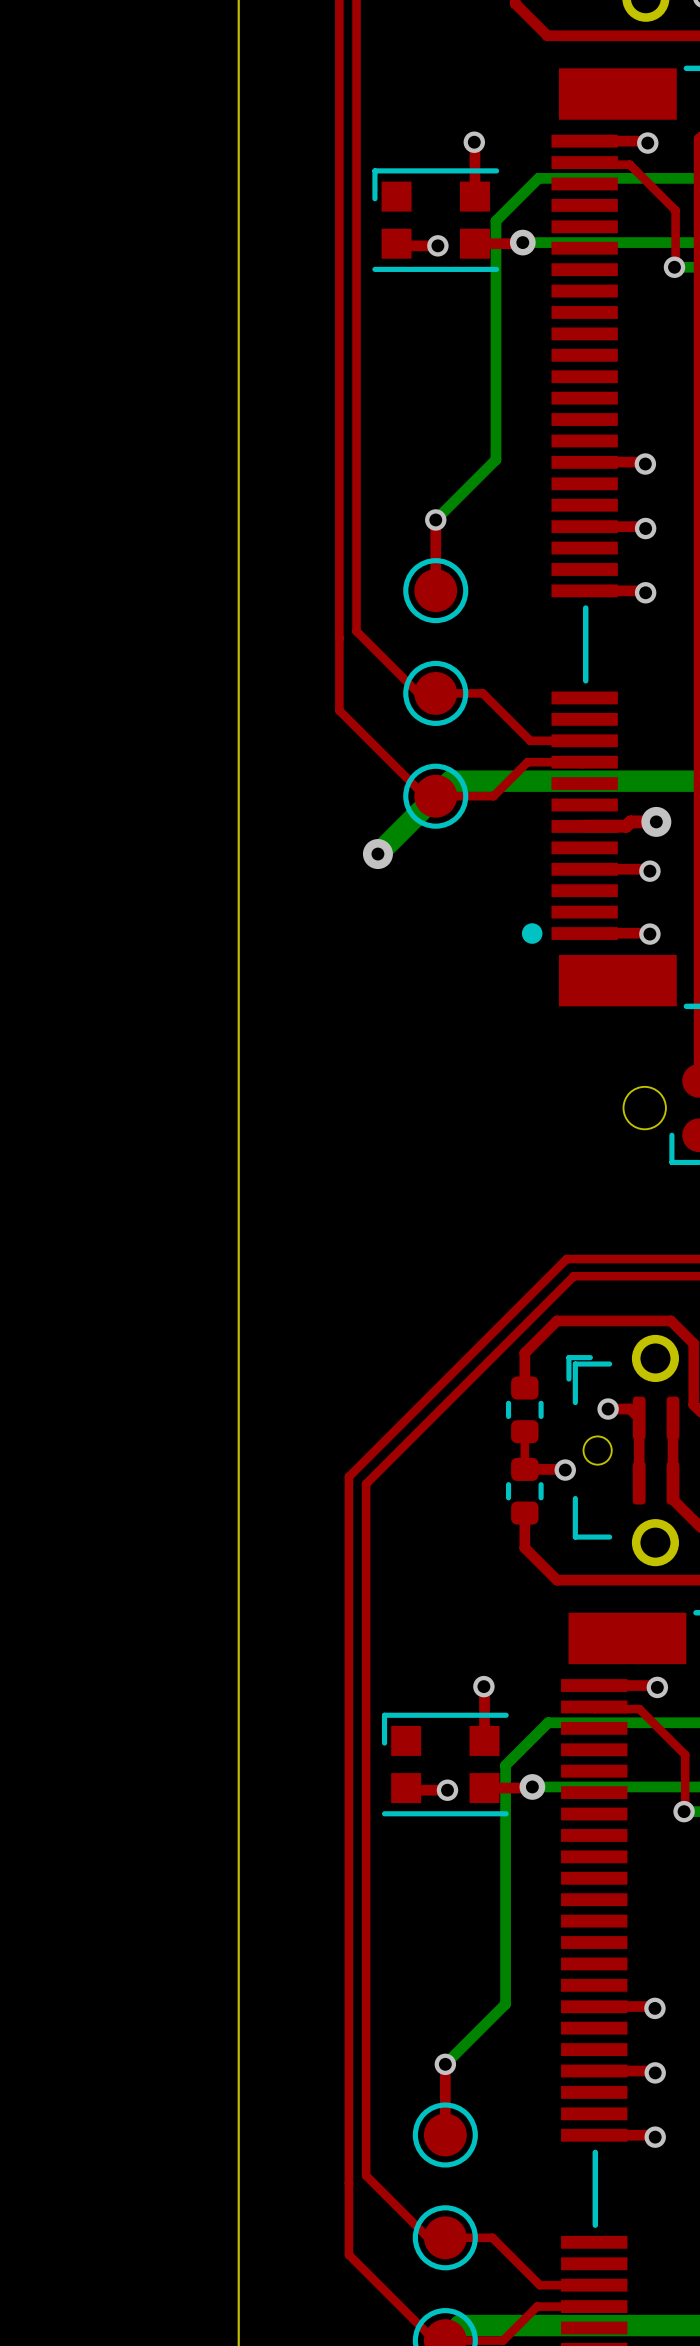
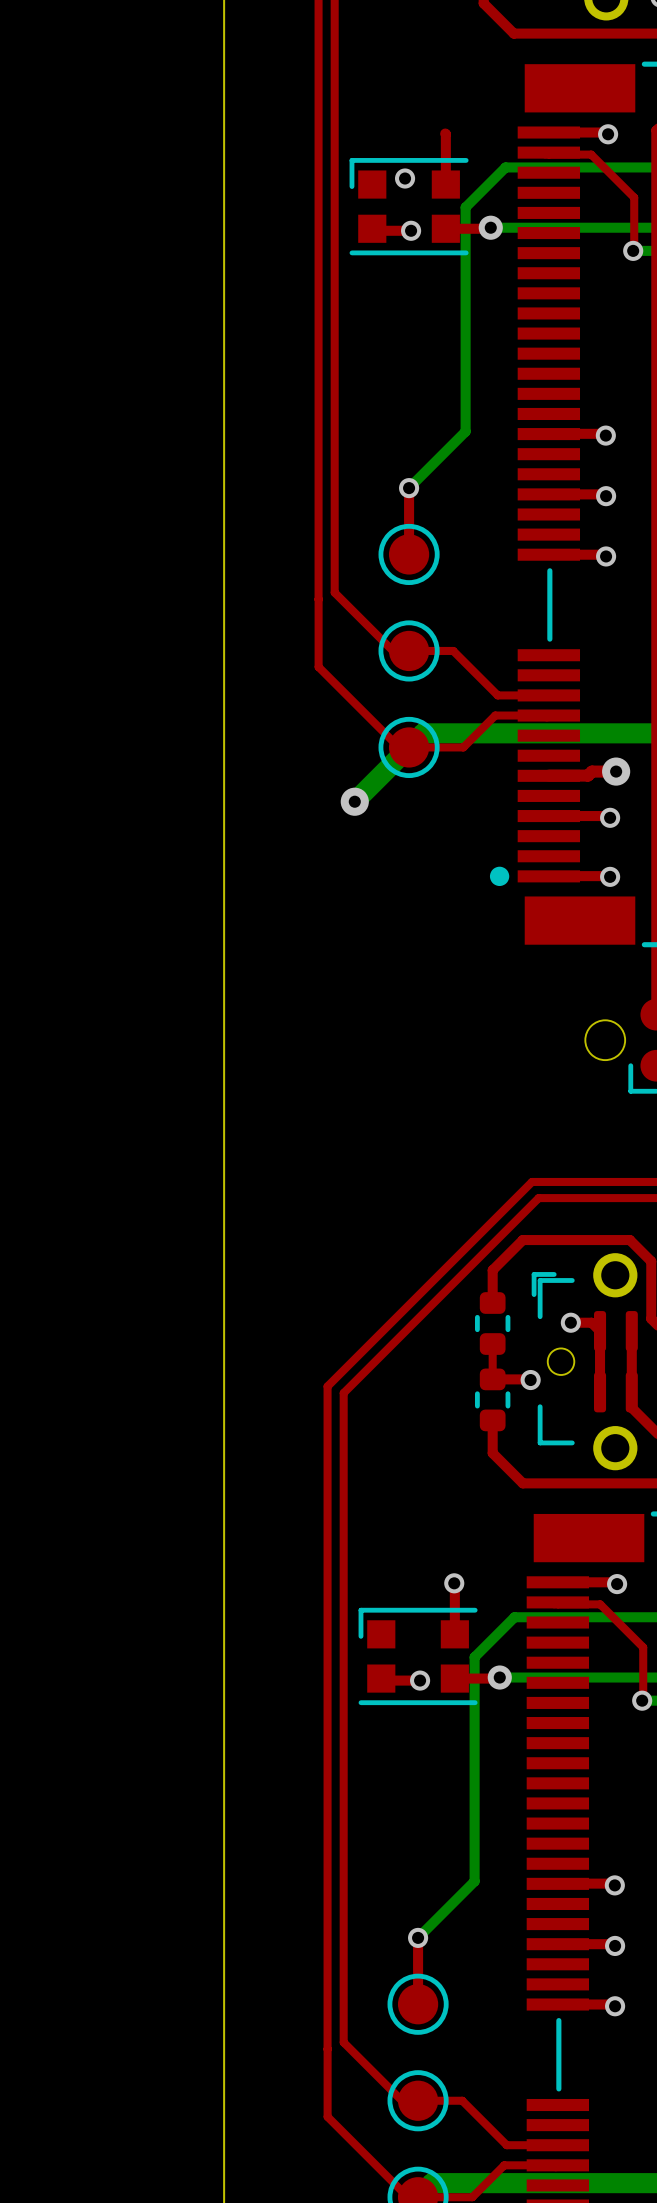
via position: (474, 142) -> (405, 178)

